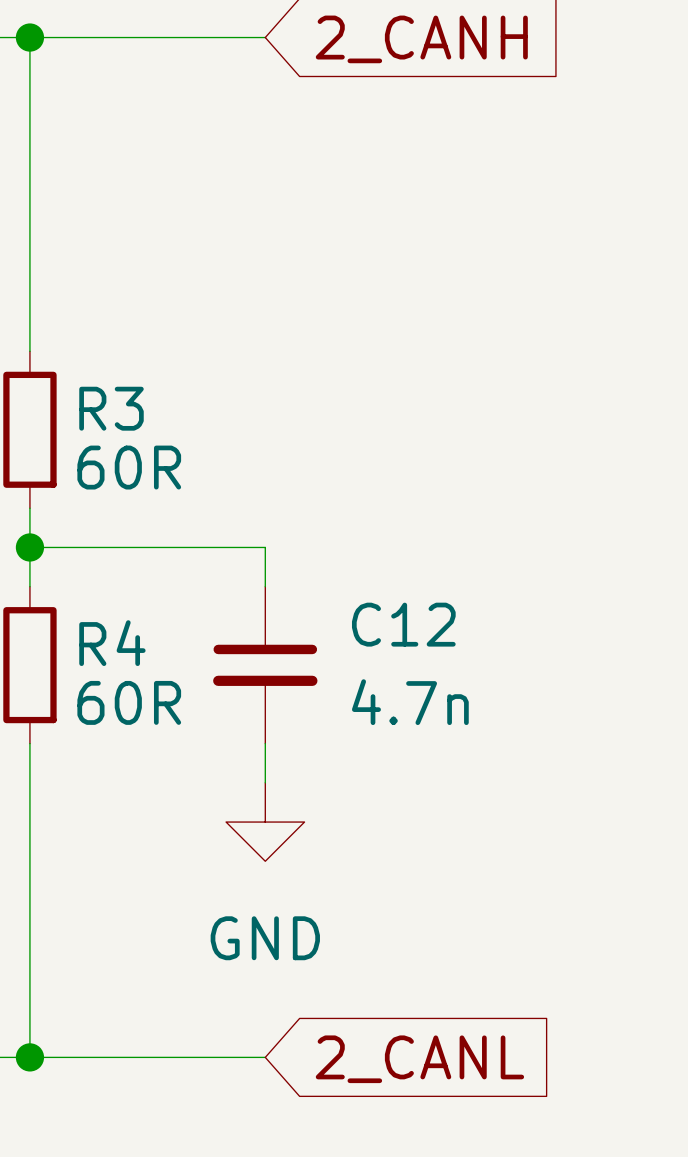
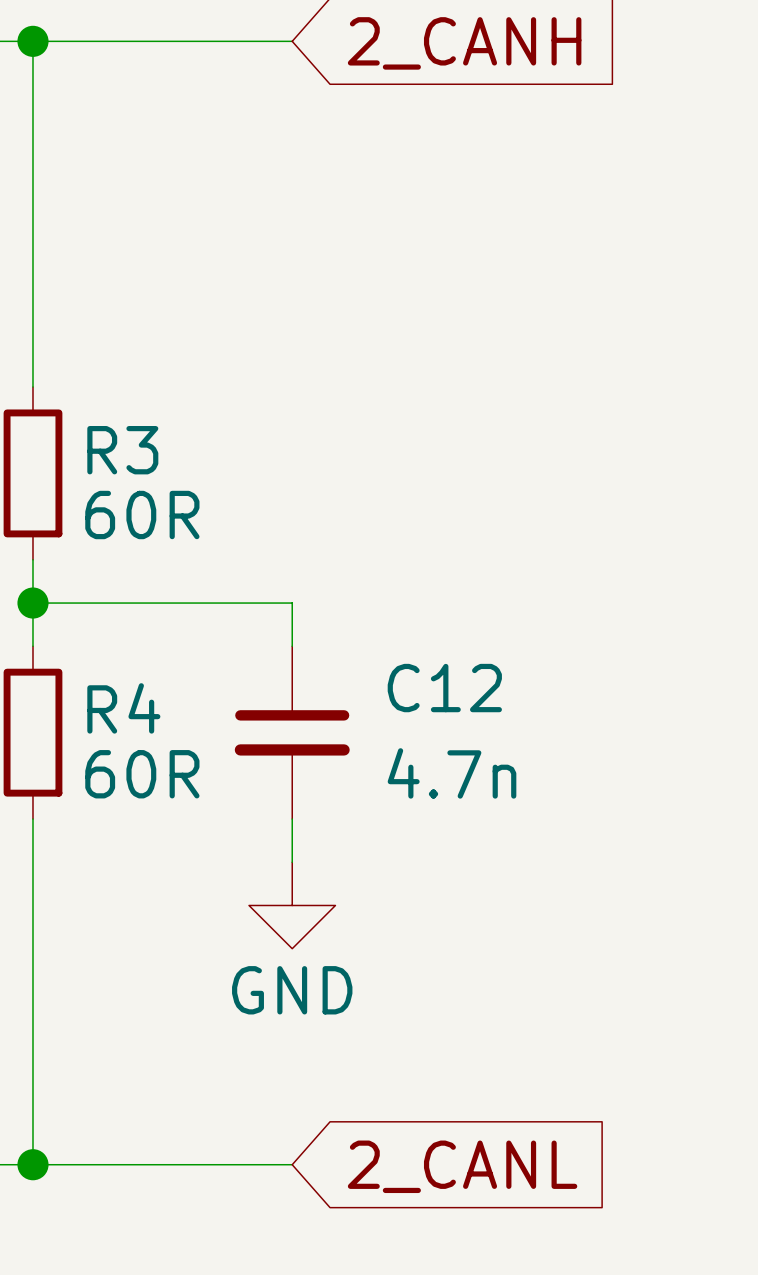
power symbol text position: GND (265, 938) -> GND (292, 990)

